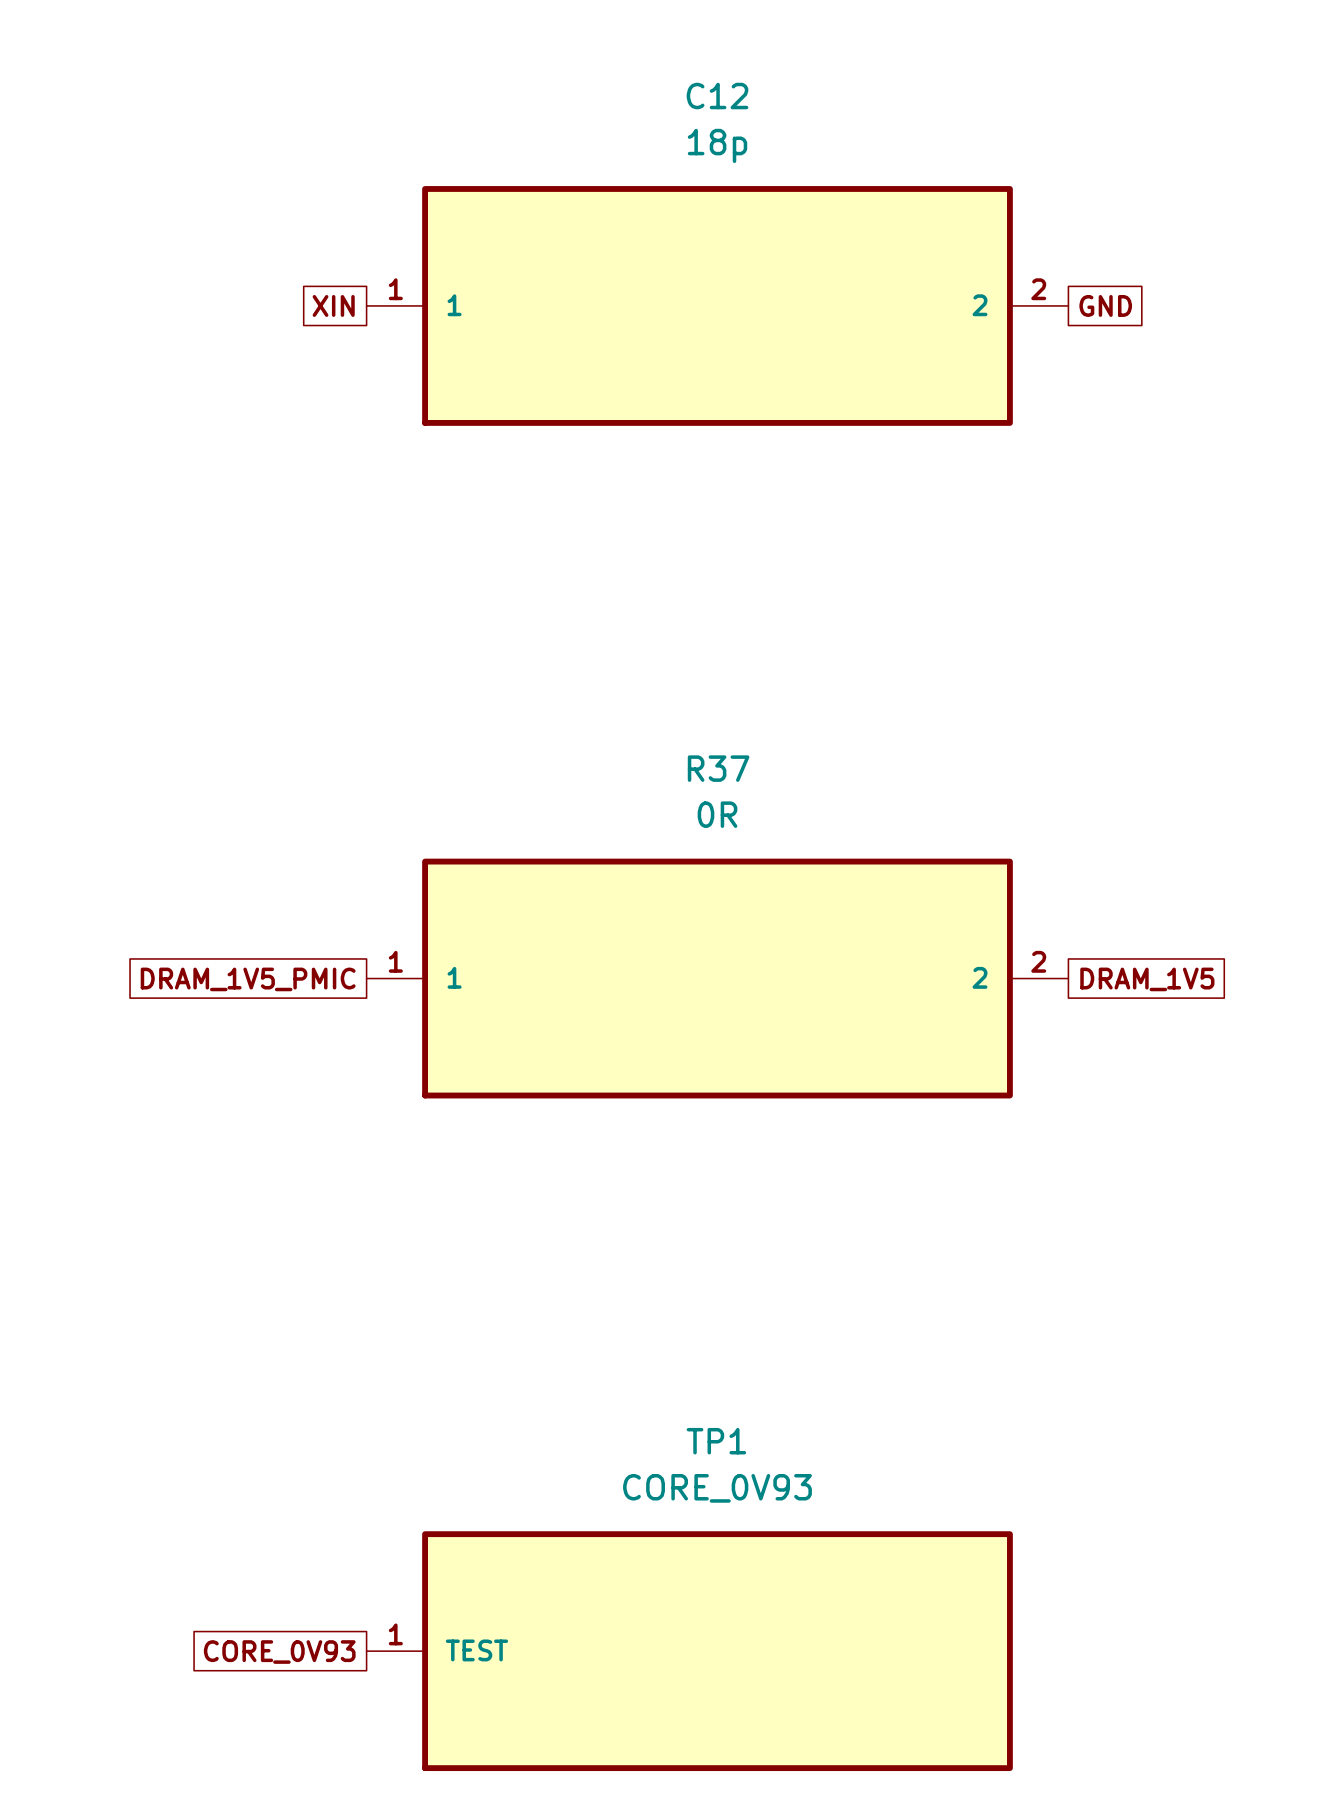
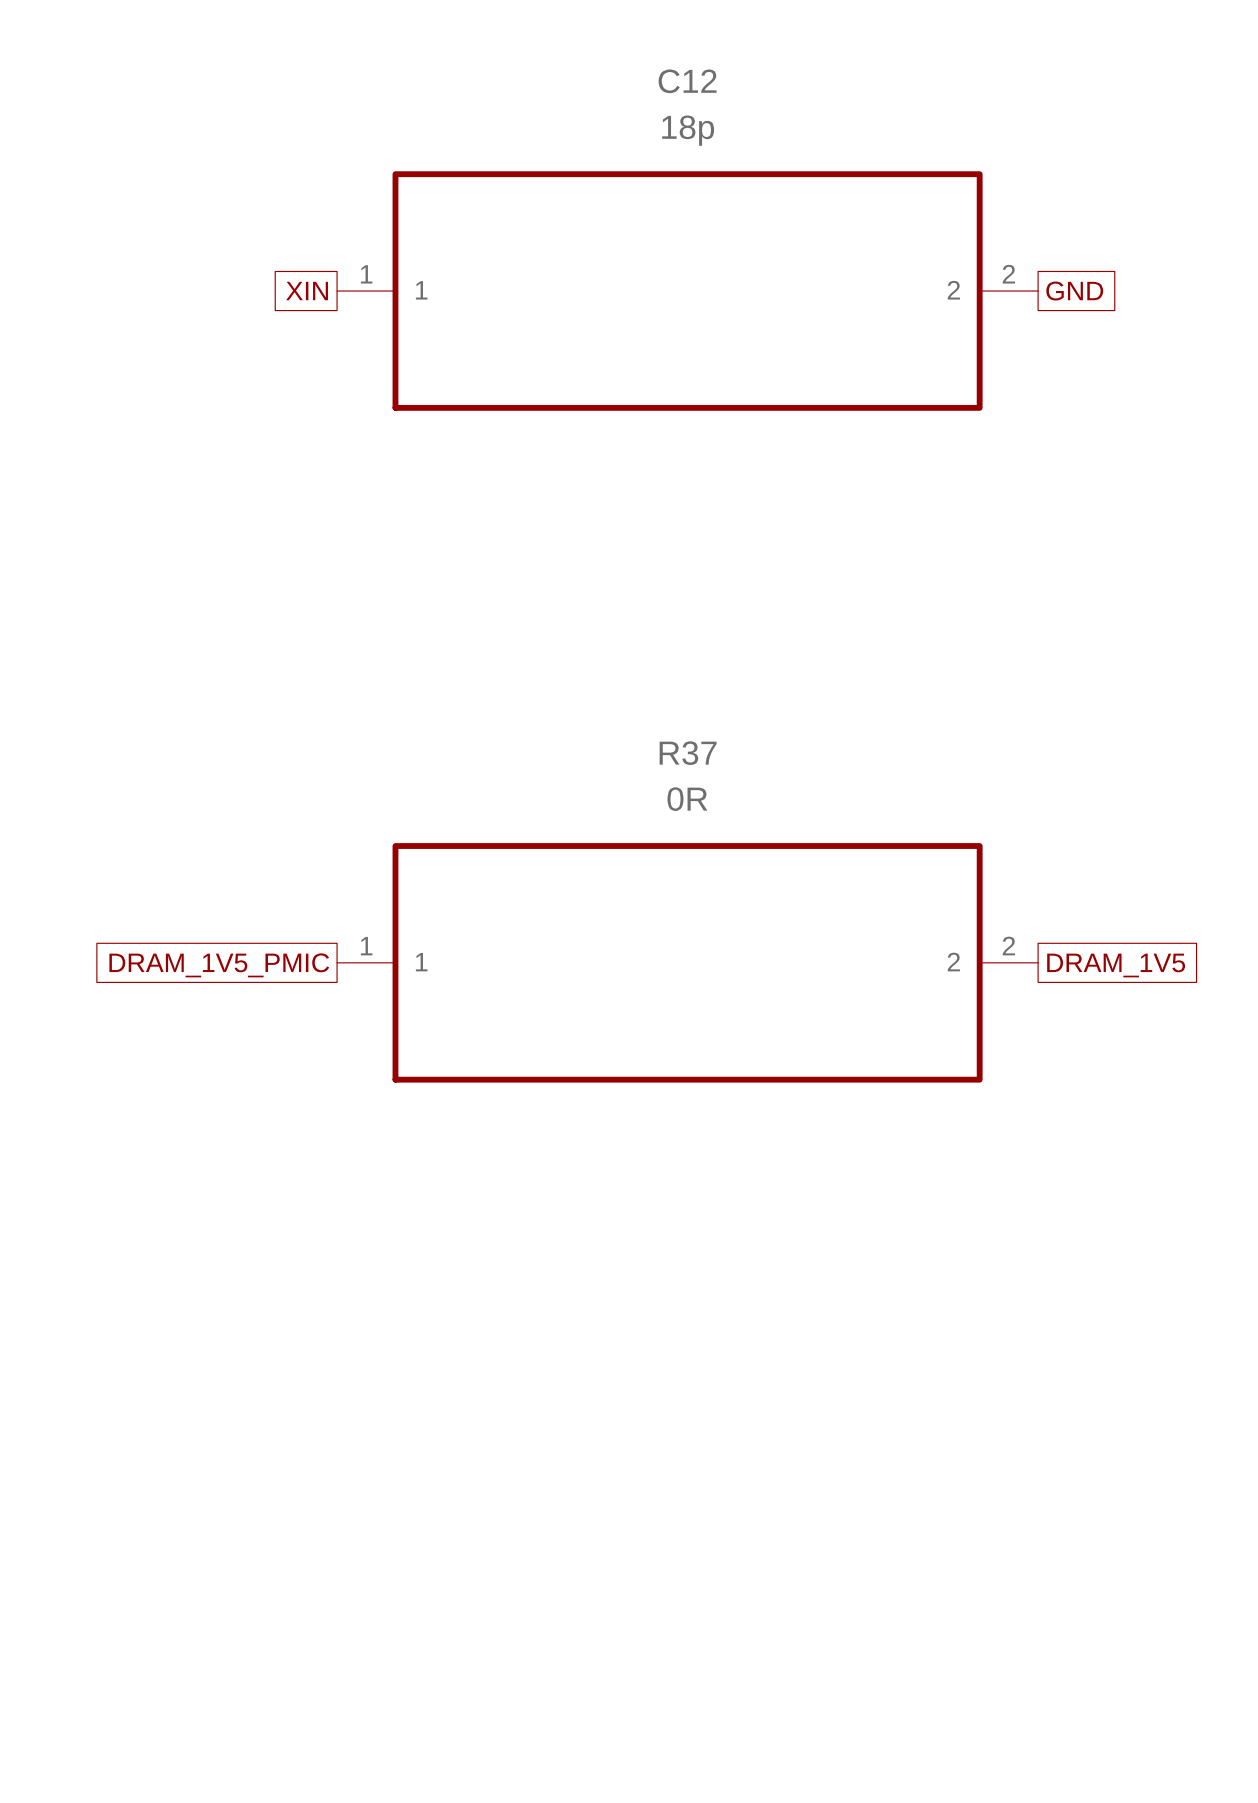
TP1: CORE_0V93 (689, 1651) -> none
global label: CORE_0V93 (279, 1652) -> none

